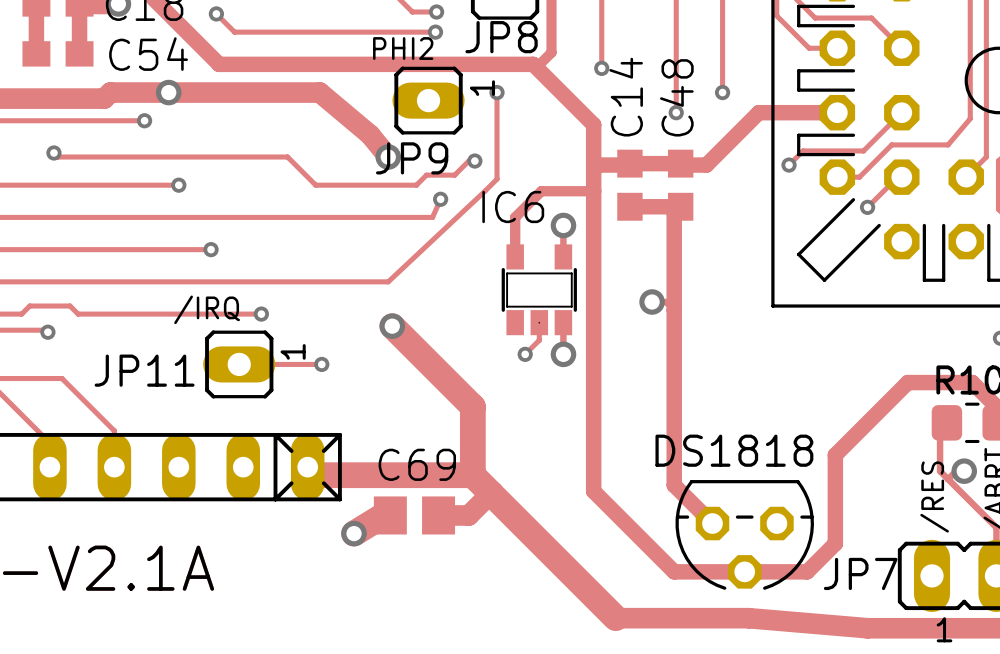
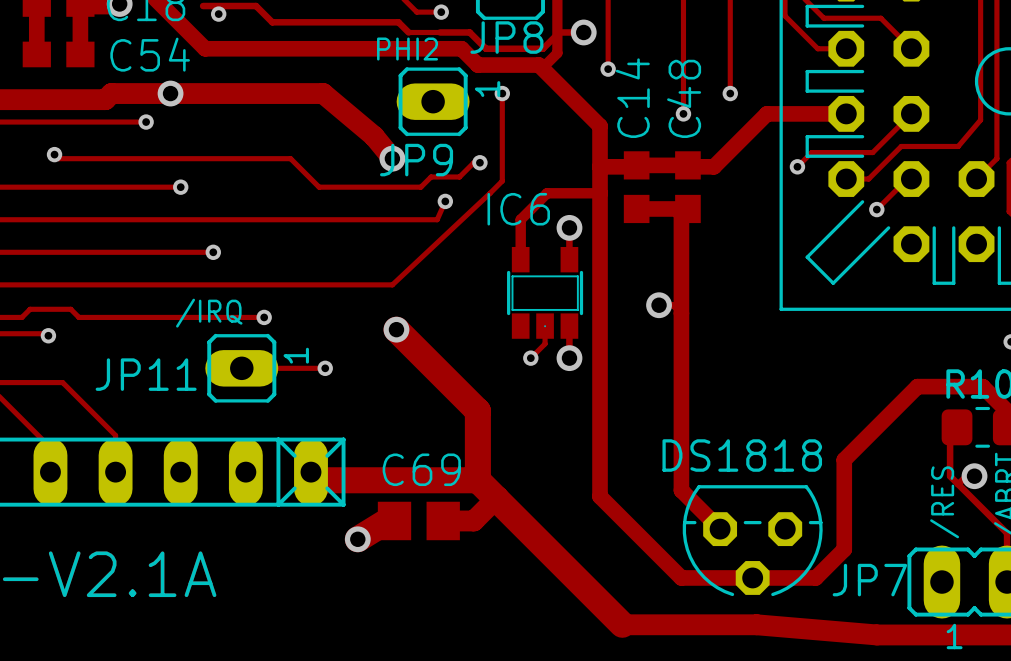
track: (216, 13) (234, 32) (404, 32) -> (203, 6) (256, 6) (272, 22) (398, 22) (408, 32)
track: none -> (440, 32) (469, 32) (486, 48) (543, 48) (559, 32) (583, 32)
via: (435, 32) -> none
via: none -> (583, 32)
track: (202, 48) (219, 64) (472, 64) -> (205, 48) (461, 48) (477, 65)

